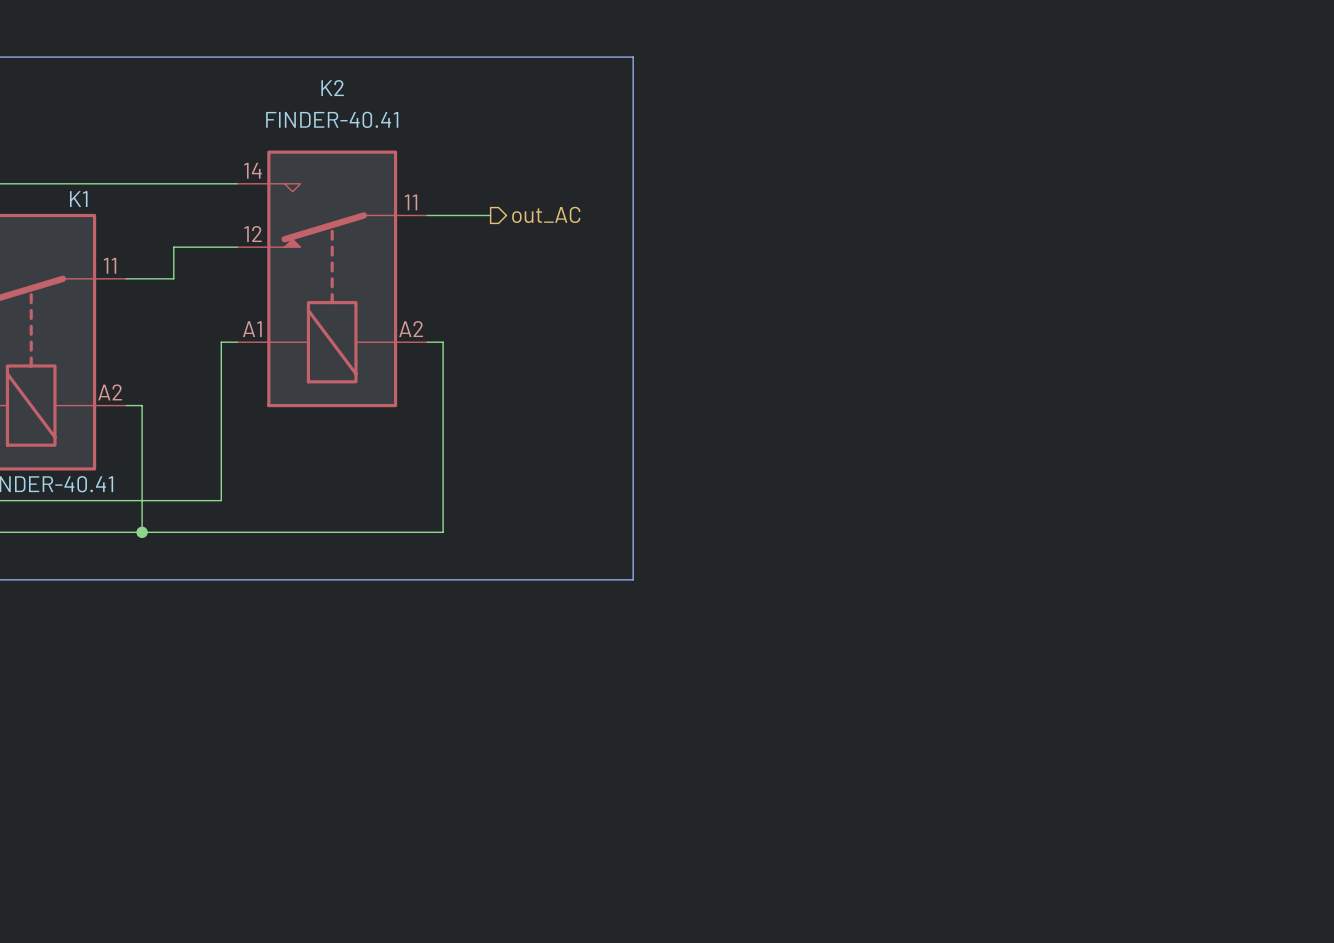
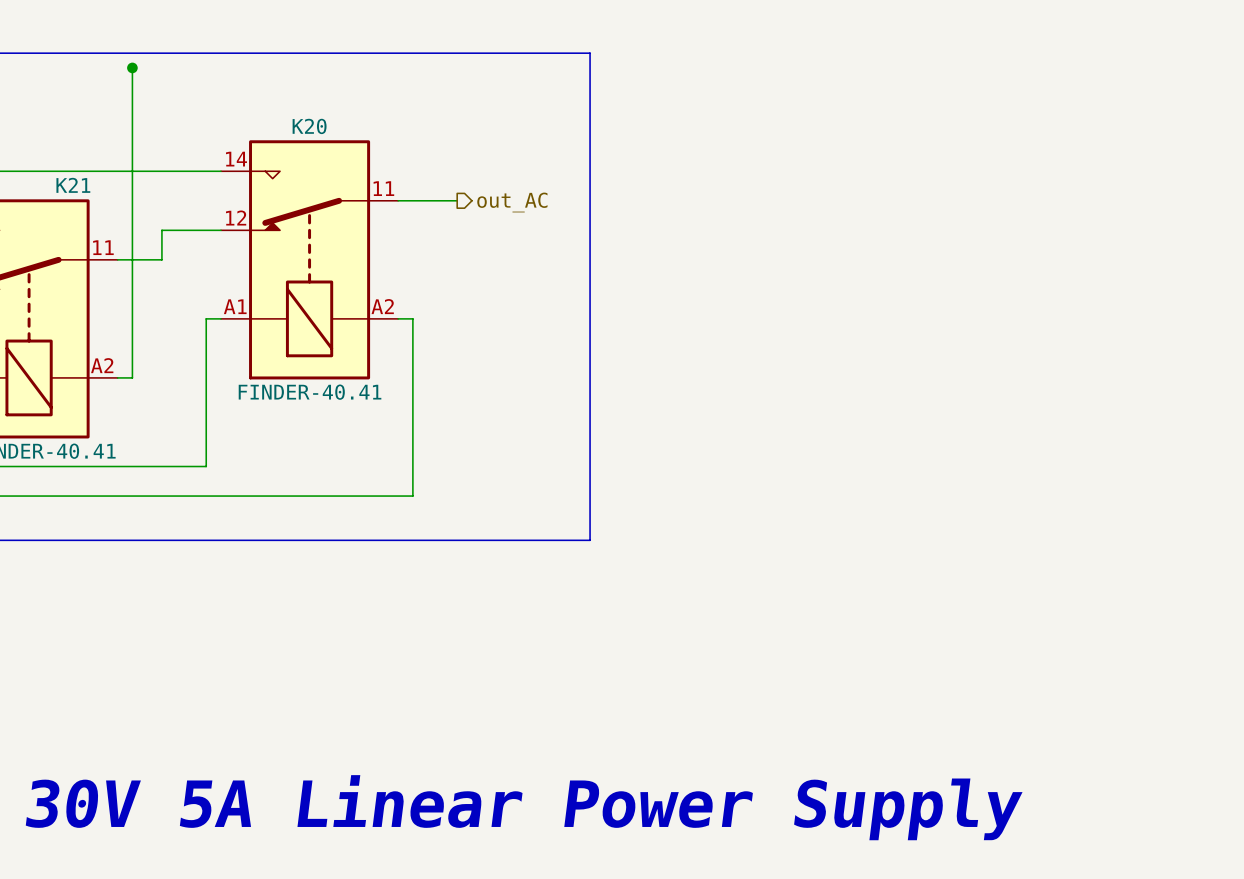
junction: none -> (132, 67)
K2 name: K2 (332, 88) -> K20 (309, 126)
K2 value position: FINDER-40.41 (332, 119) -> FINDER-40.41 (310, 392)
K1 name: K1 (78, 199) -> K21 (73, 185)
wire: (142, 405) (142, 532) -> (132, 377) (132, 67)
junction: (142, 532) -> none
text: none -> 30V 5A Linear Power Supply (524, 807)

